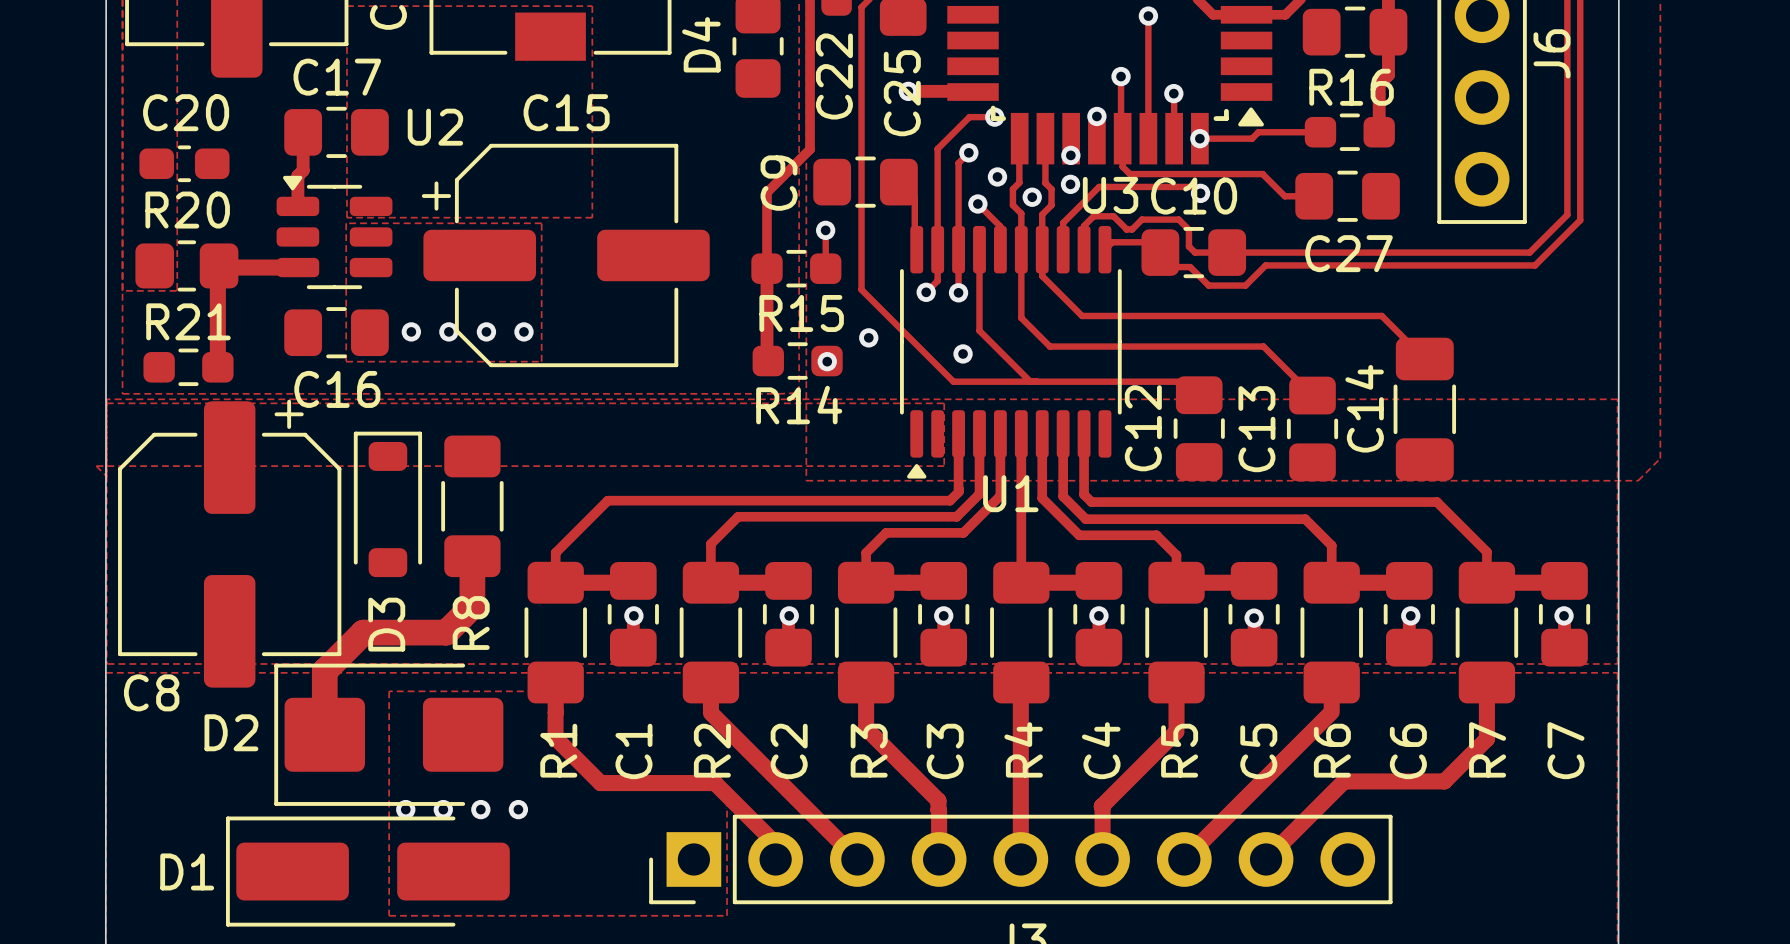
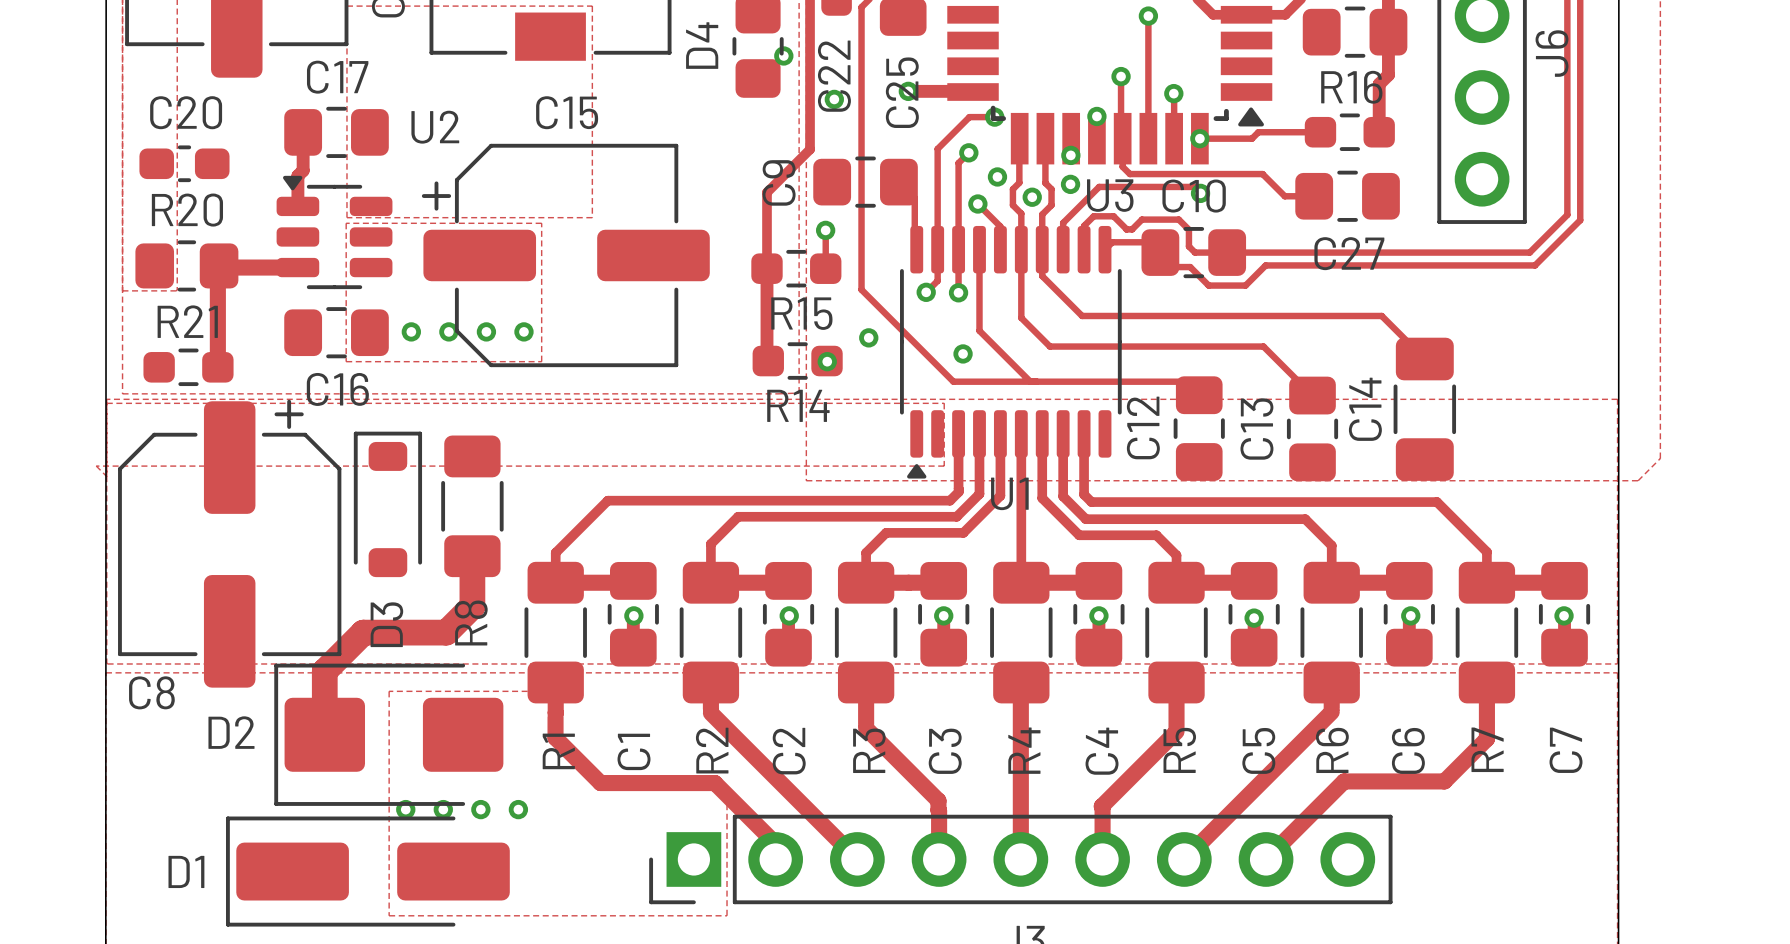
via: none -> (783, 55)
via: none -> (834, 99)

